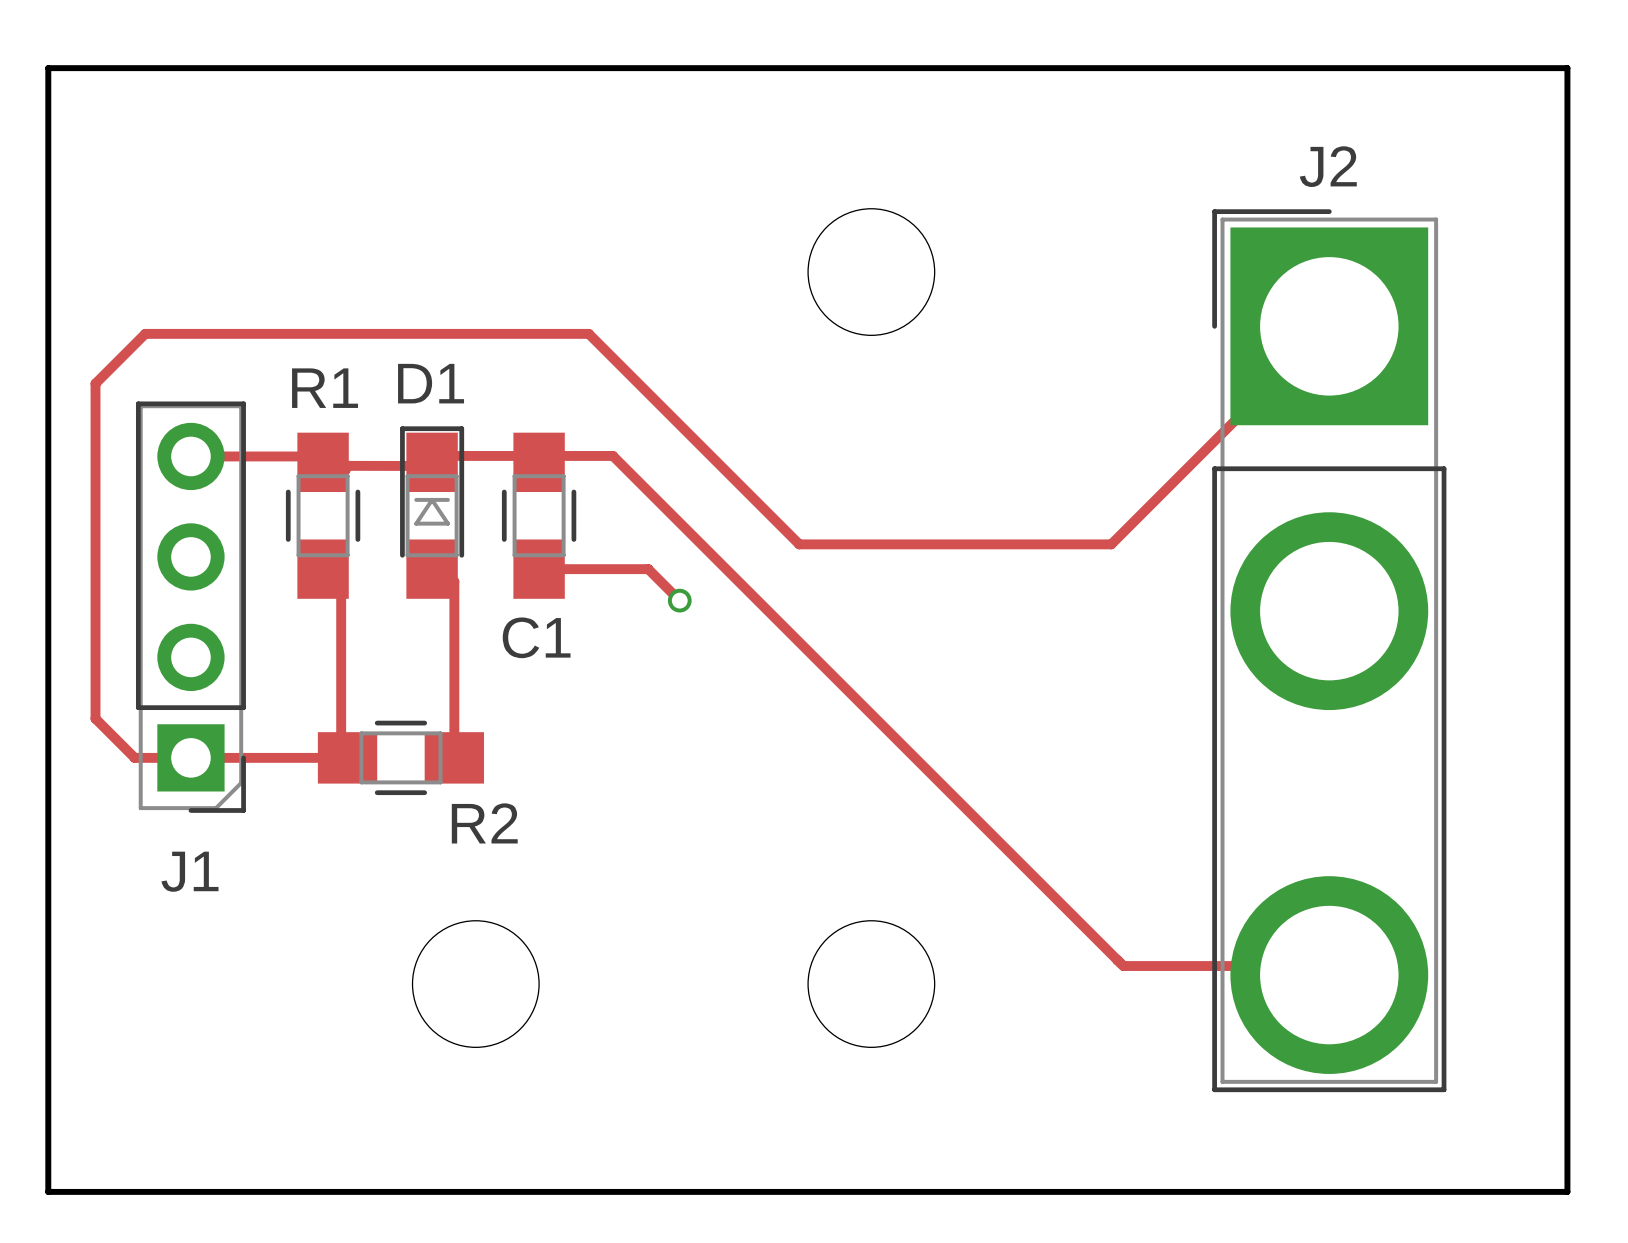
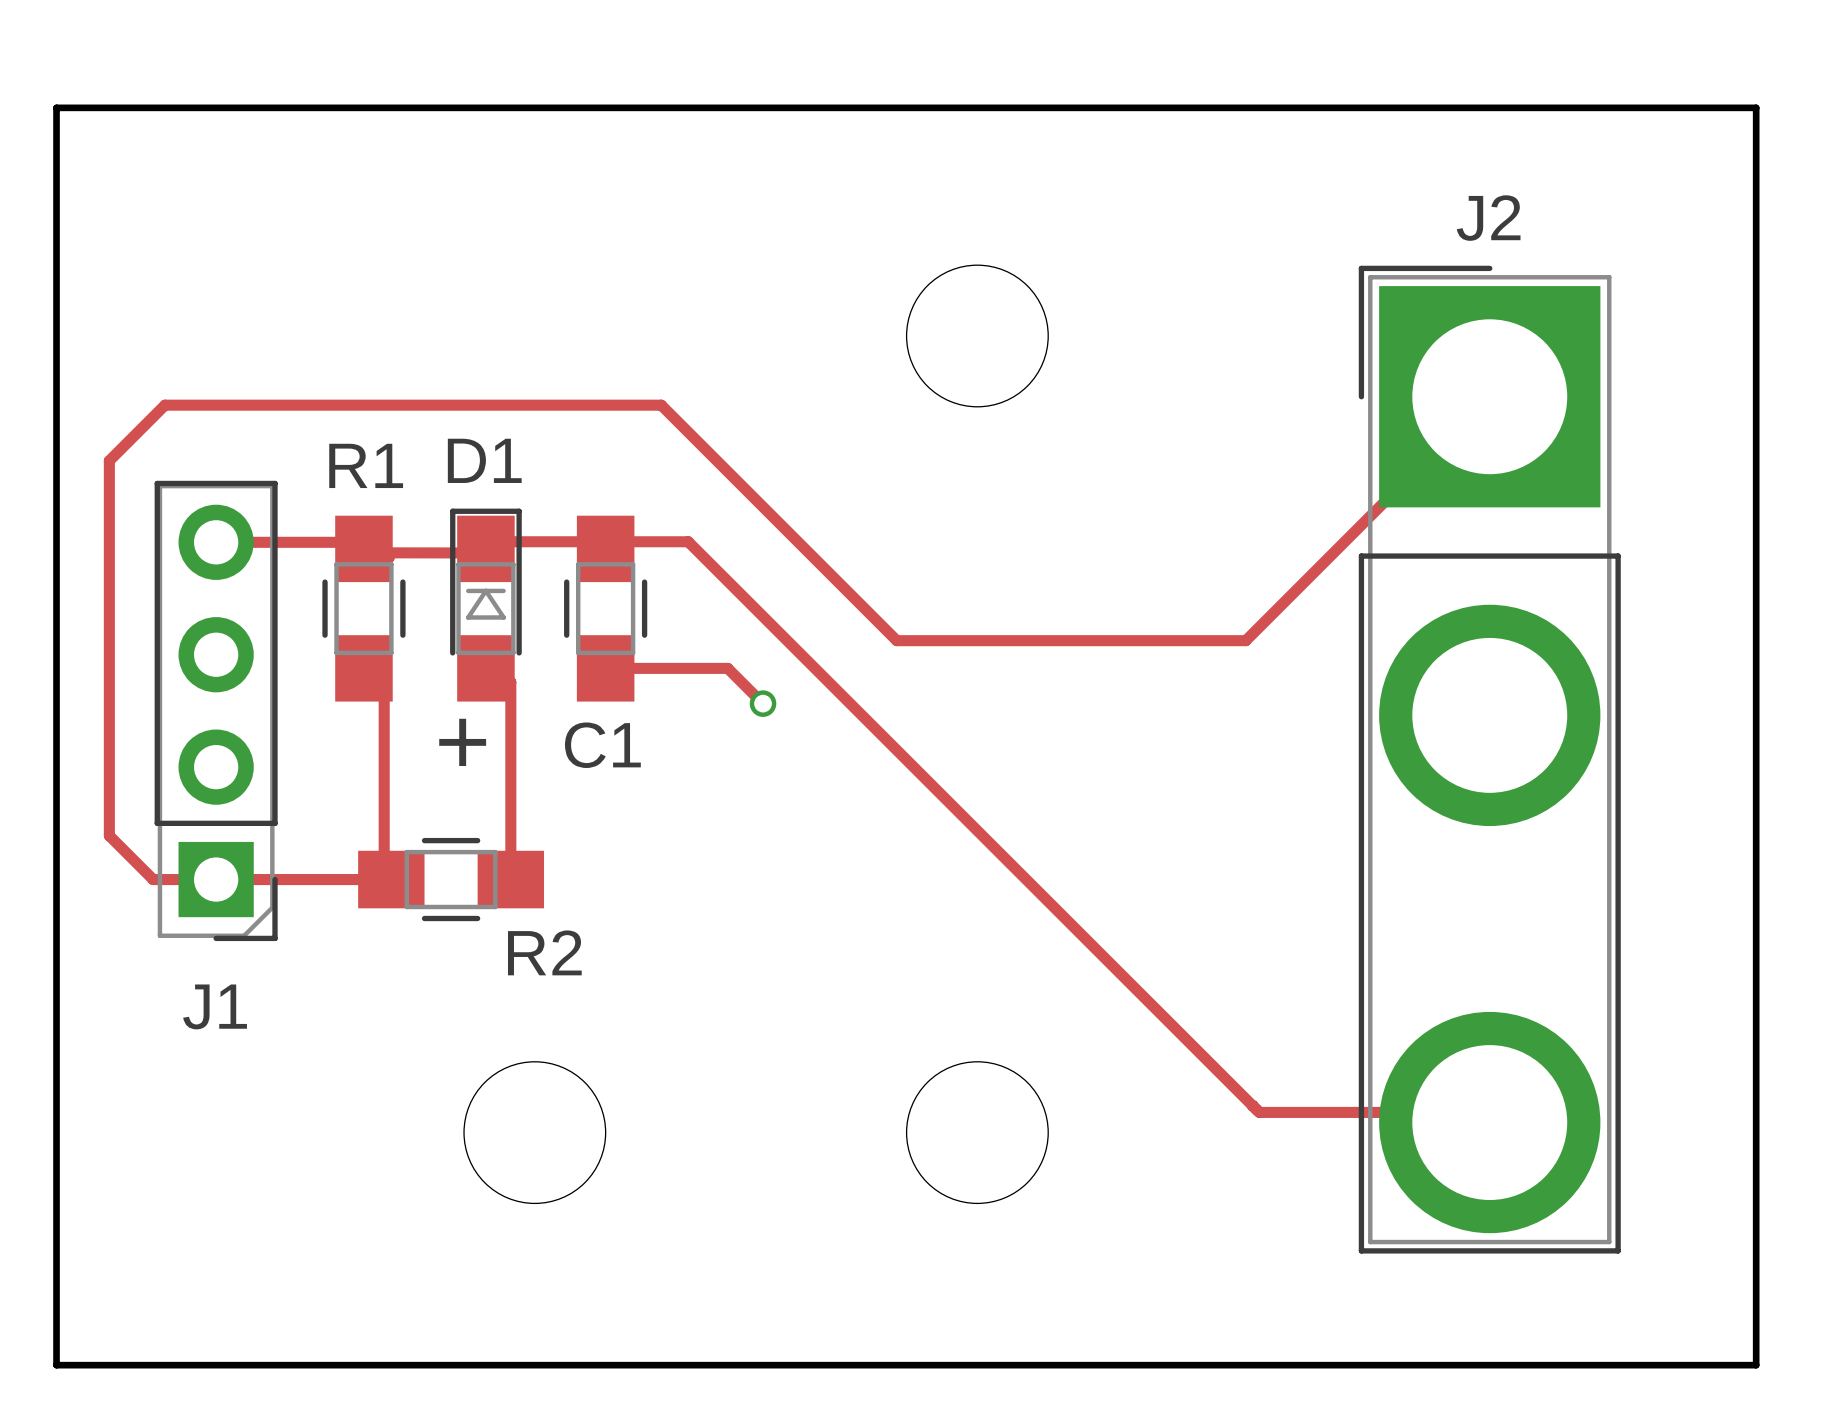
text: none -> + (462, 742)

